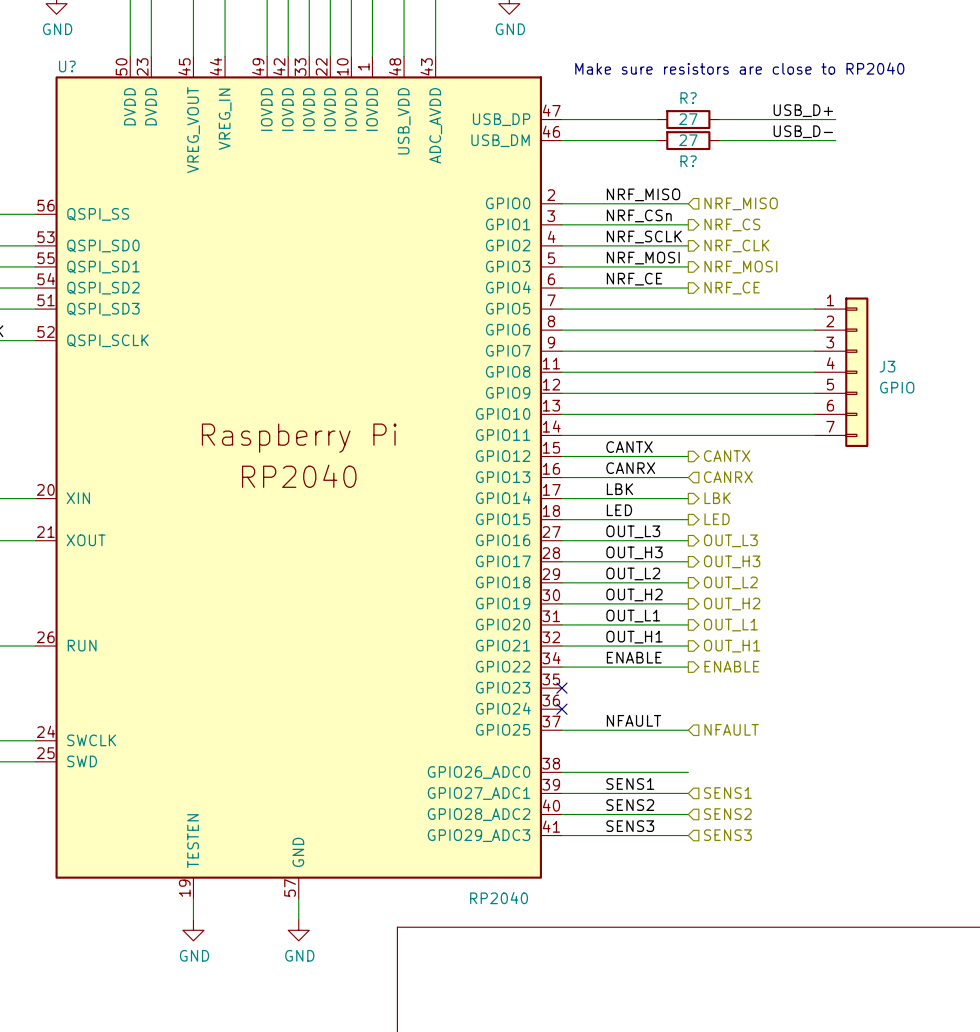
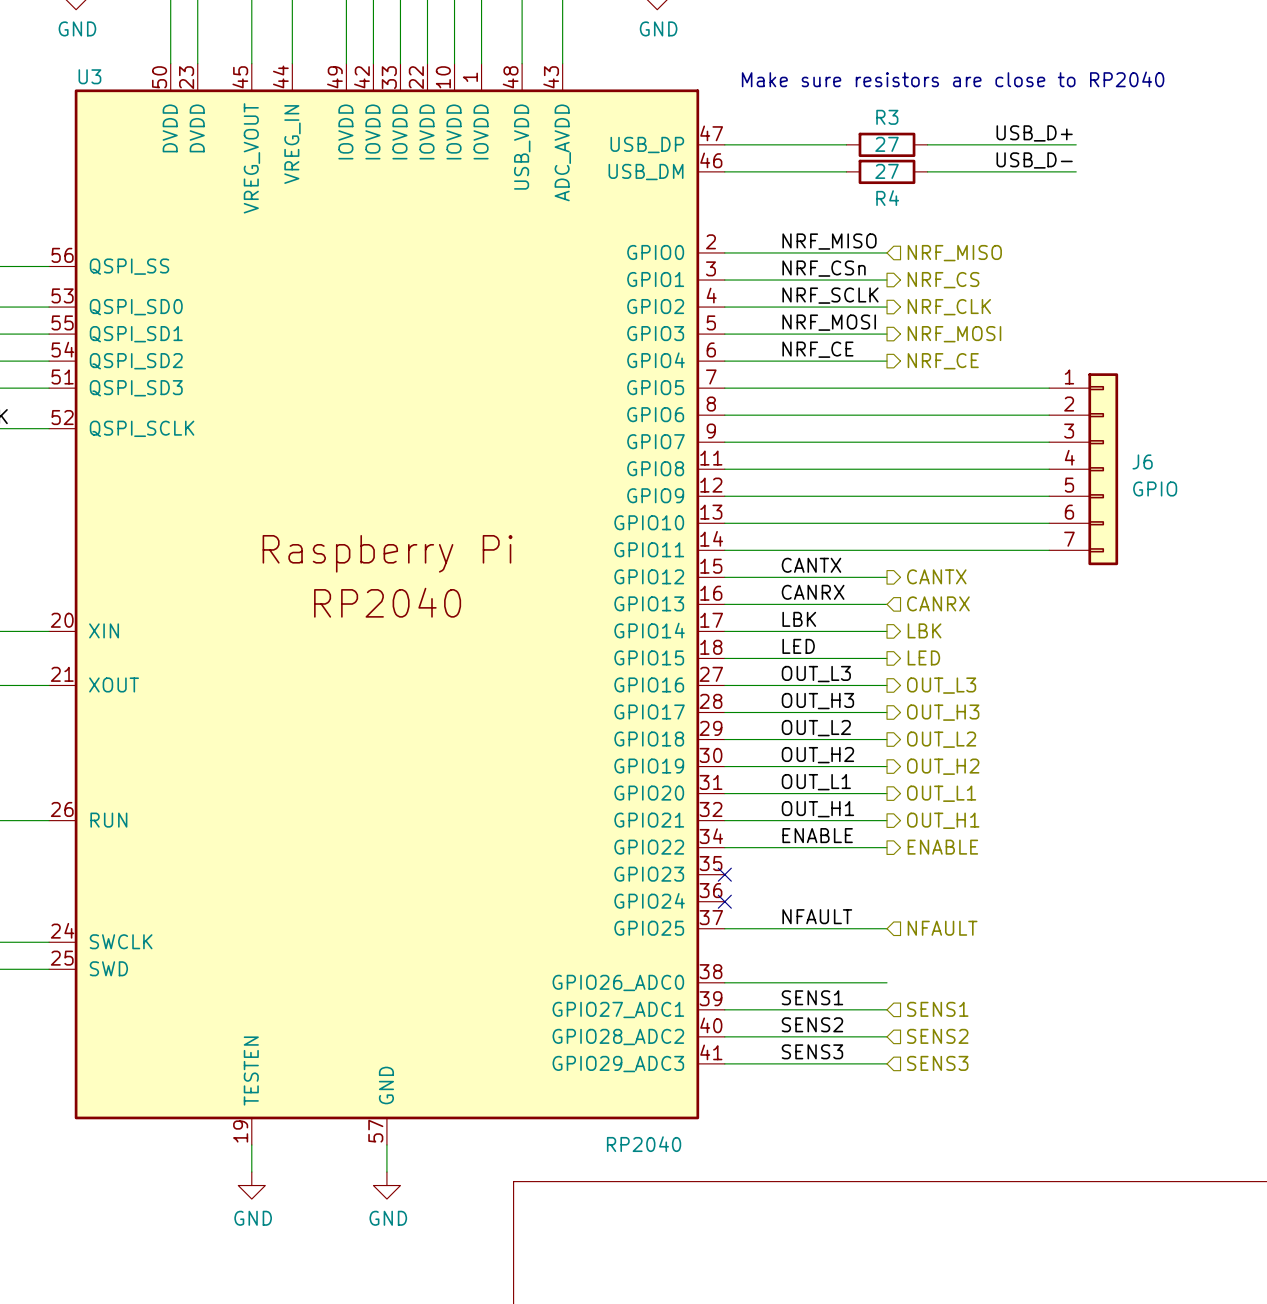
U? name: U? (67, 66) -> U3 (89, 76)
R? name: R? (688, 98) -> R3 (887, 117)
R? name: R? (688, 161) -> R4 (887, 198)
J3 name: J3 (887, 366) -> J6 (1142, 461)

